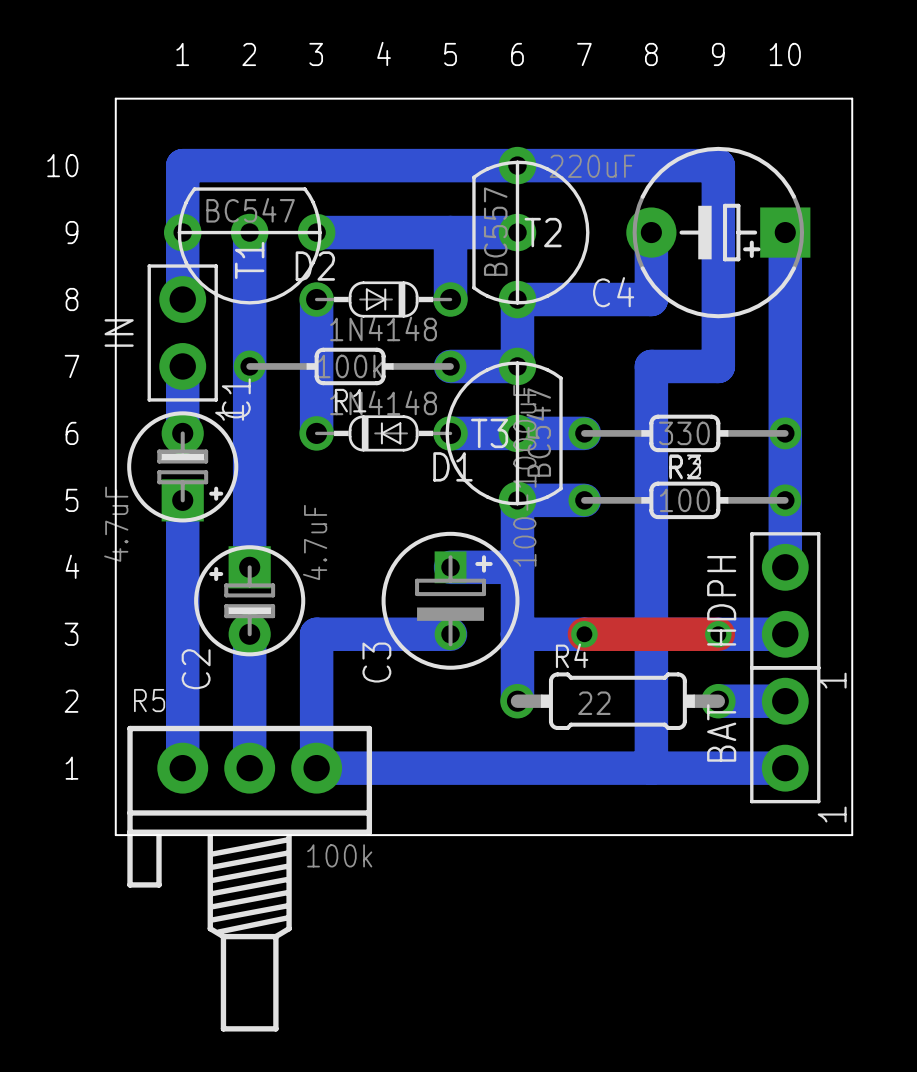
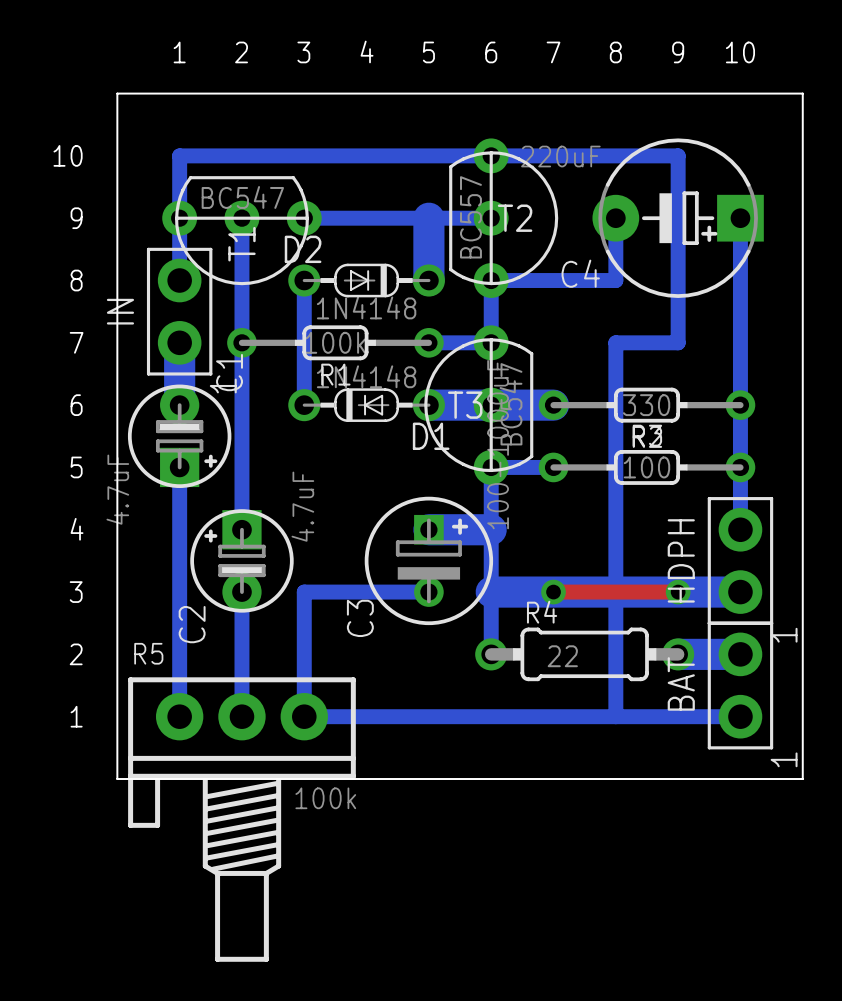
bottom track width: thick (249, 232) (249, 567) -> thin (241, 218) (241, 529)
bottom track width: thick (316, 232) (517, 232) -> thin (304, 218) (491, 218)
bottom track width: thick (651, 232) (651, 299) (517, 299) (517, 366) (450, 366) -> thin (615, 218) (615, 280) (491, 280) (491, 342) (428, 342)
bottom track width: thick (785, 232) (785, 567) -> thin (740, 218) (740, 529)
bottom track width: thick (182, 299) (182, 165) (718, 165) (718, 366) (651, 366) (651, 768) -> thin (179, 280) (179, 155) (678, 155) (678, 342) (615, 342) (615, 716)
bottom track width: thick (316, 299) (316, 433) -> thin (304, 280) (304, 405)
bottom track width: thick (182, 500) (182, 768) -> thin (179, 467) (179, 716)
bottom track width: thick (584, 500) (517, 500) (517, 701) -> thin (553, 467) (491, 467) (491, 654)
bottom track width: thick (249, 634) (249, 768) -> thin (241, 592) (241, 716)
bottom track width: thick (450, 634) (316, 634) (316, 768) (785, 768) -> thin (428, 592) (304, 592) (304, 716) (740, 716)
top track width: thick (584, 634) (718, 634) -> thin (553, 592) (678, 592)

